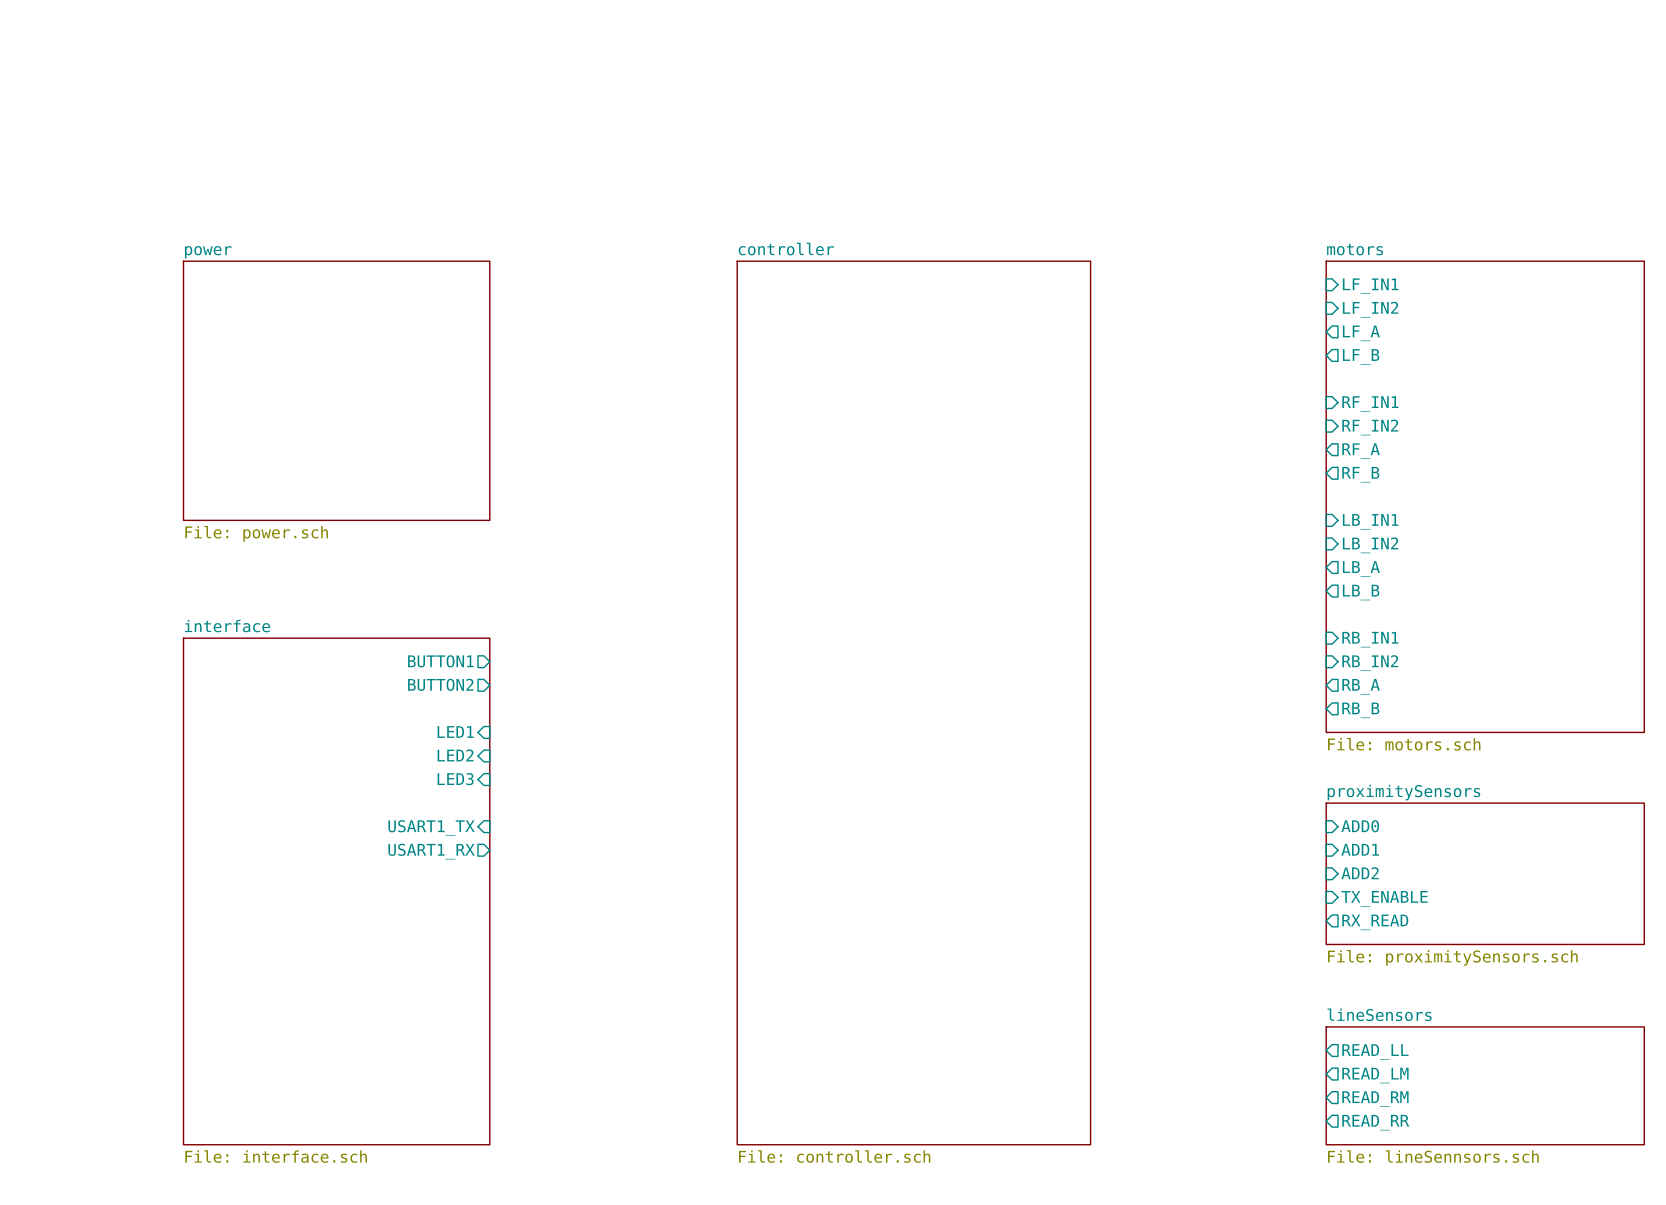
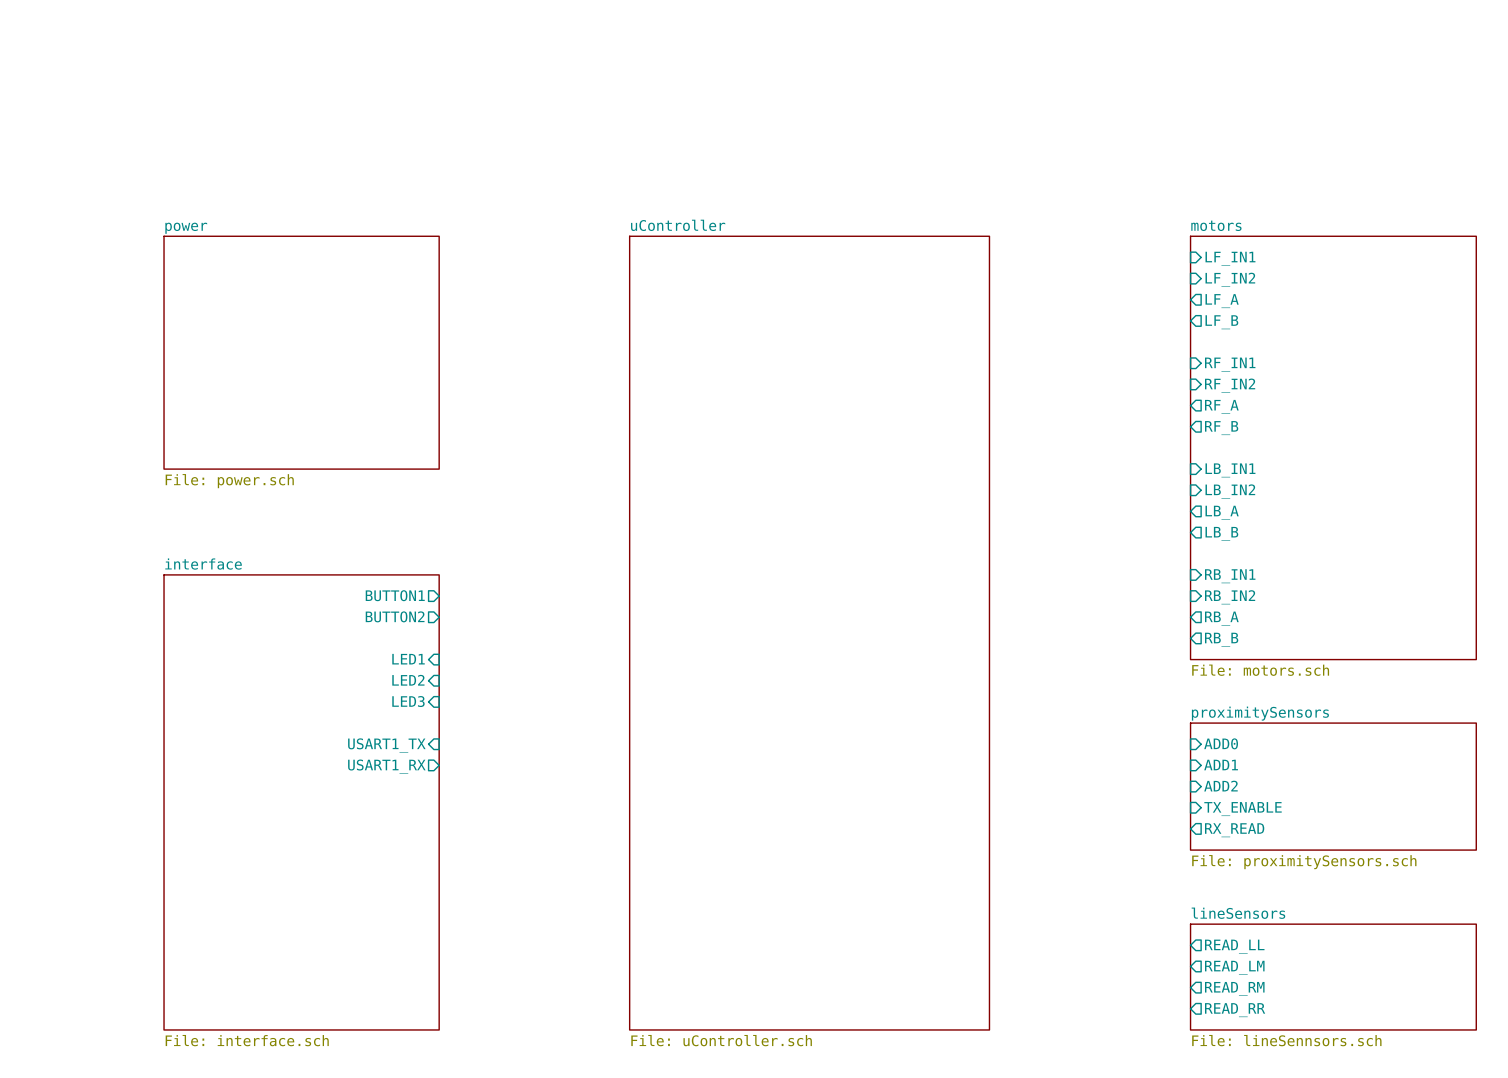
sheet uController: none -> File: uController.sch (809, 633)
sheet controller: File: controller.sch (913, 702) -> none

